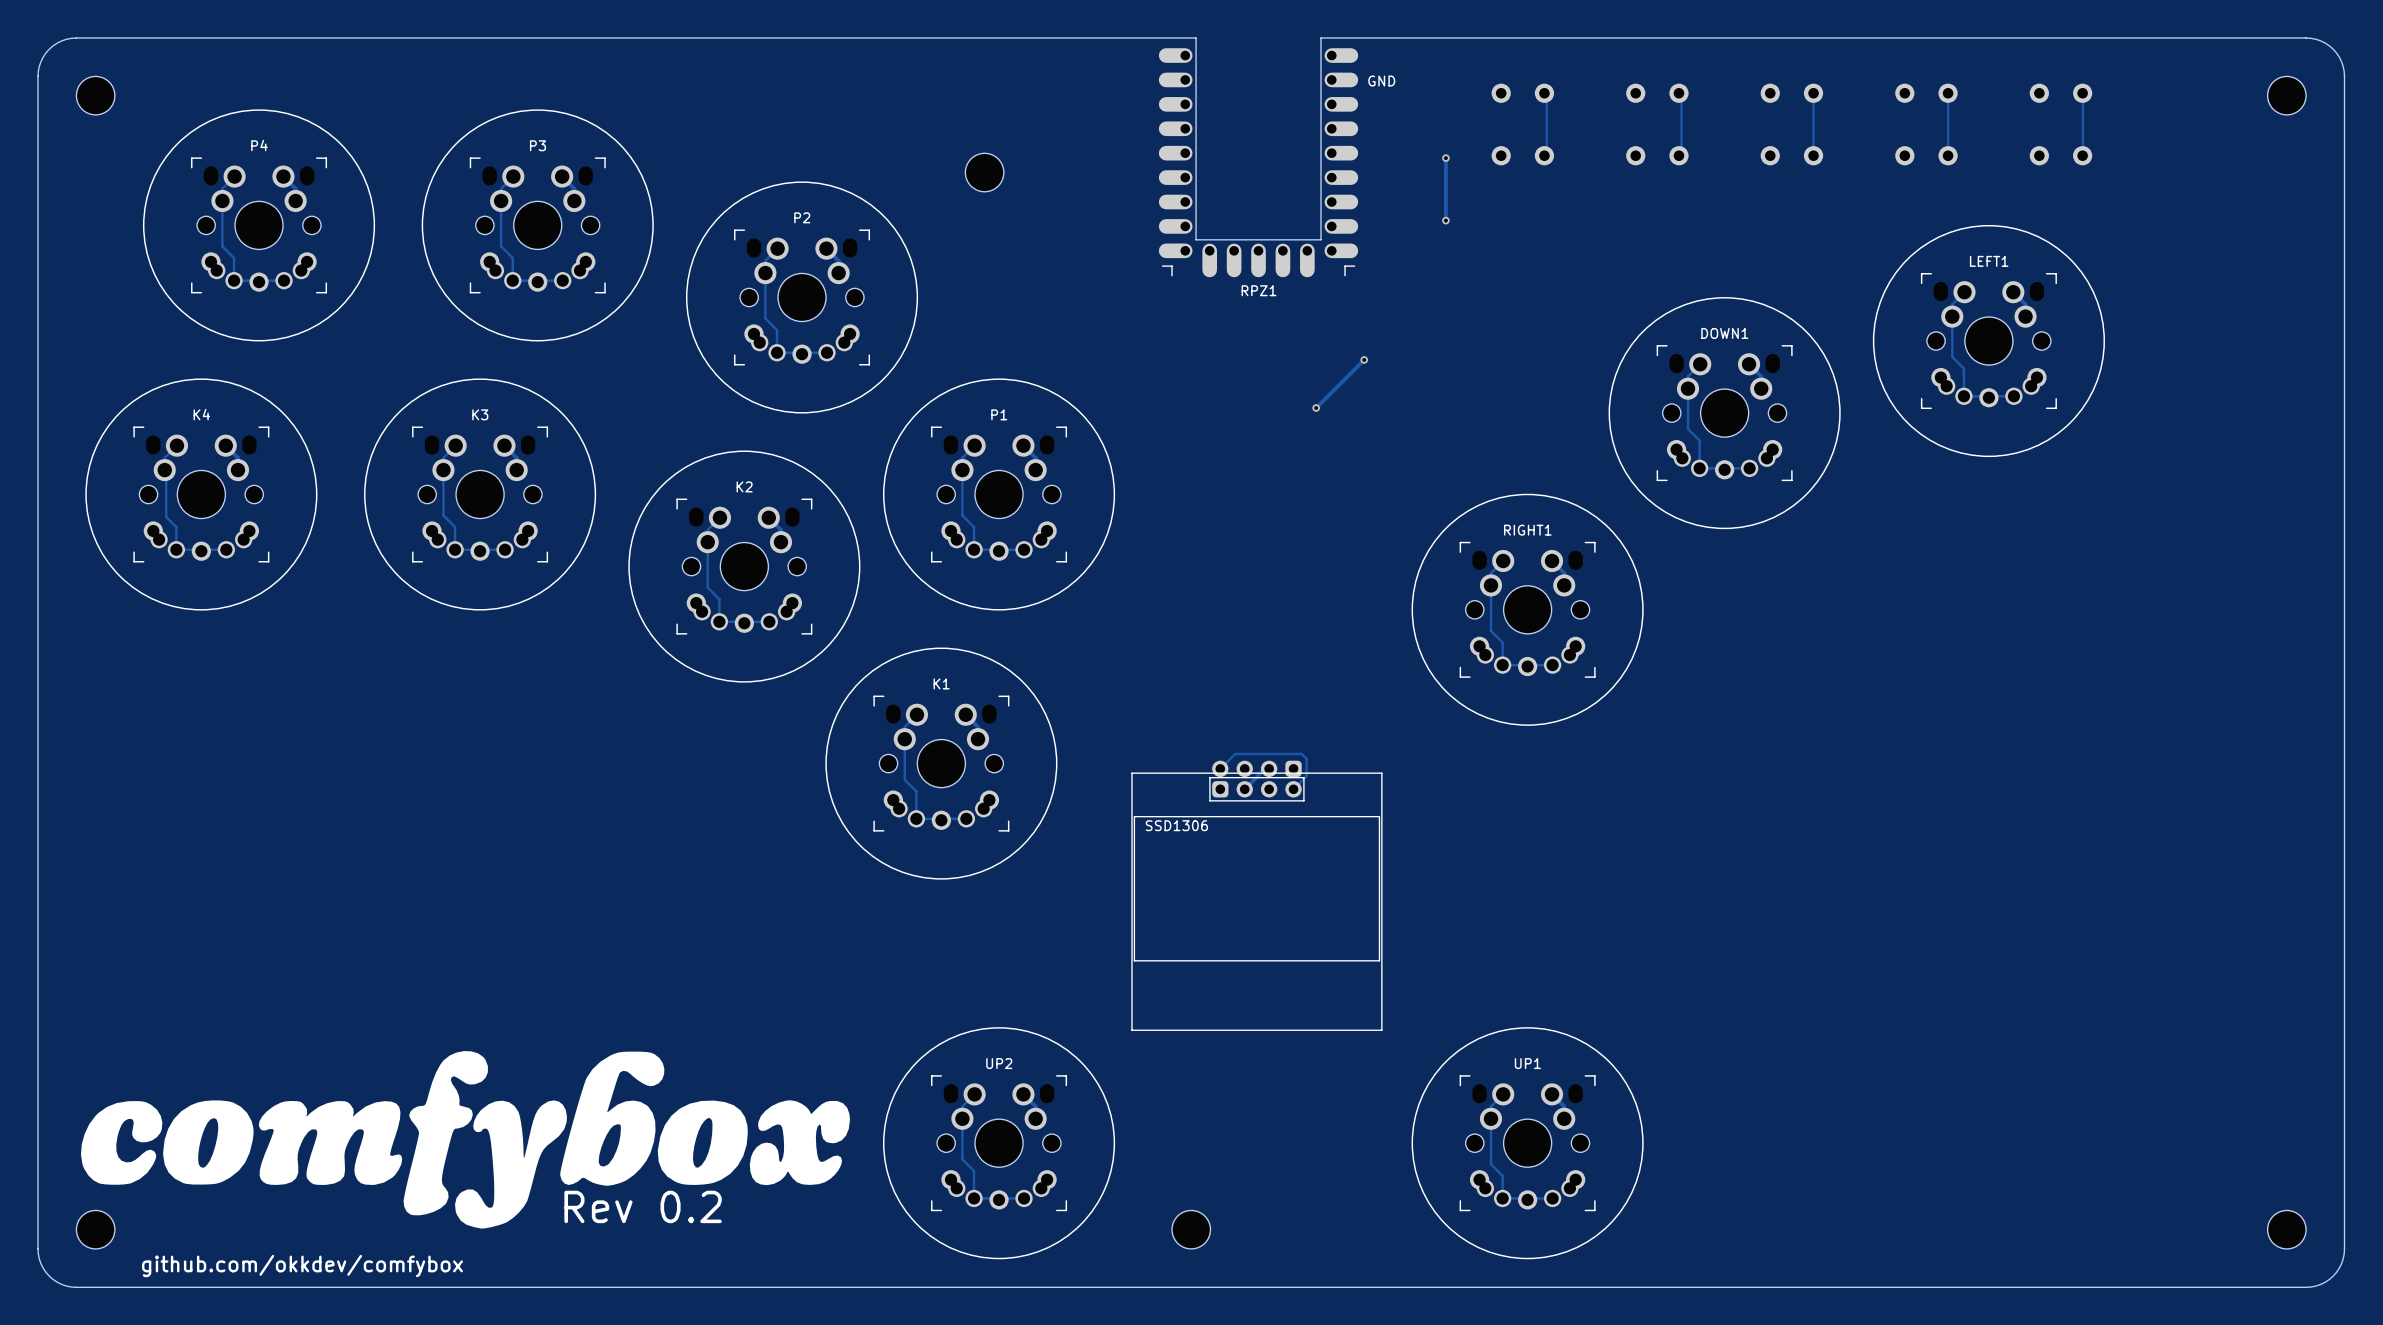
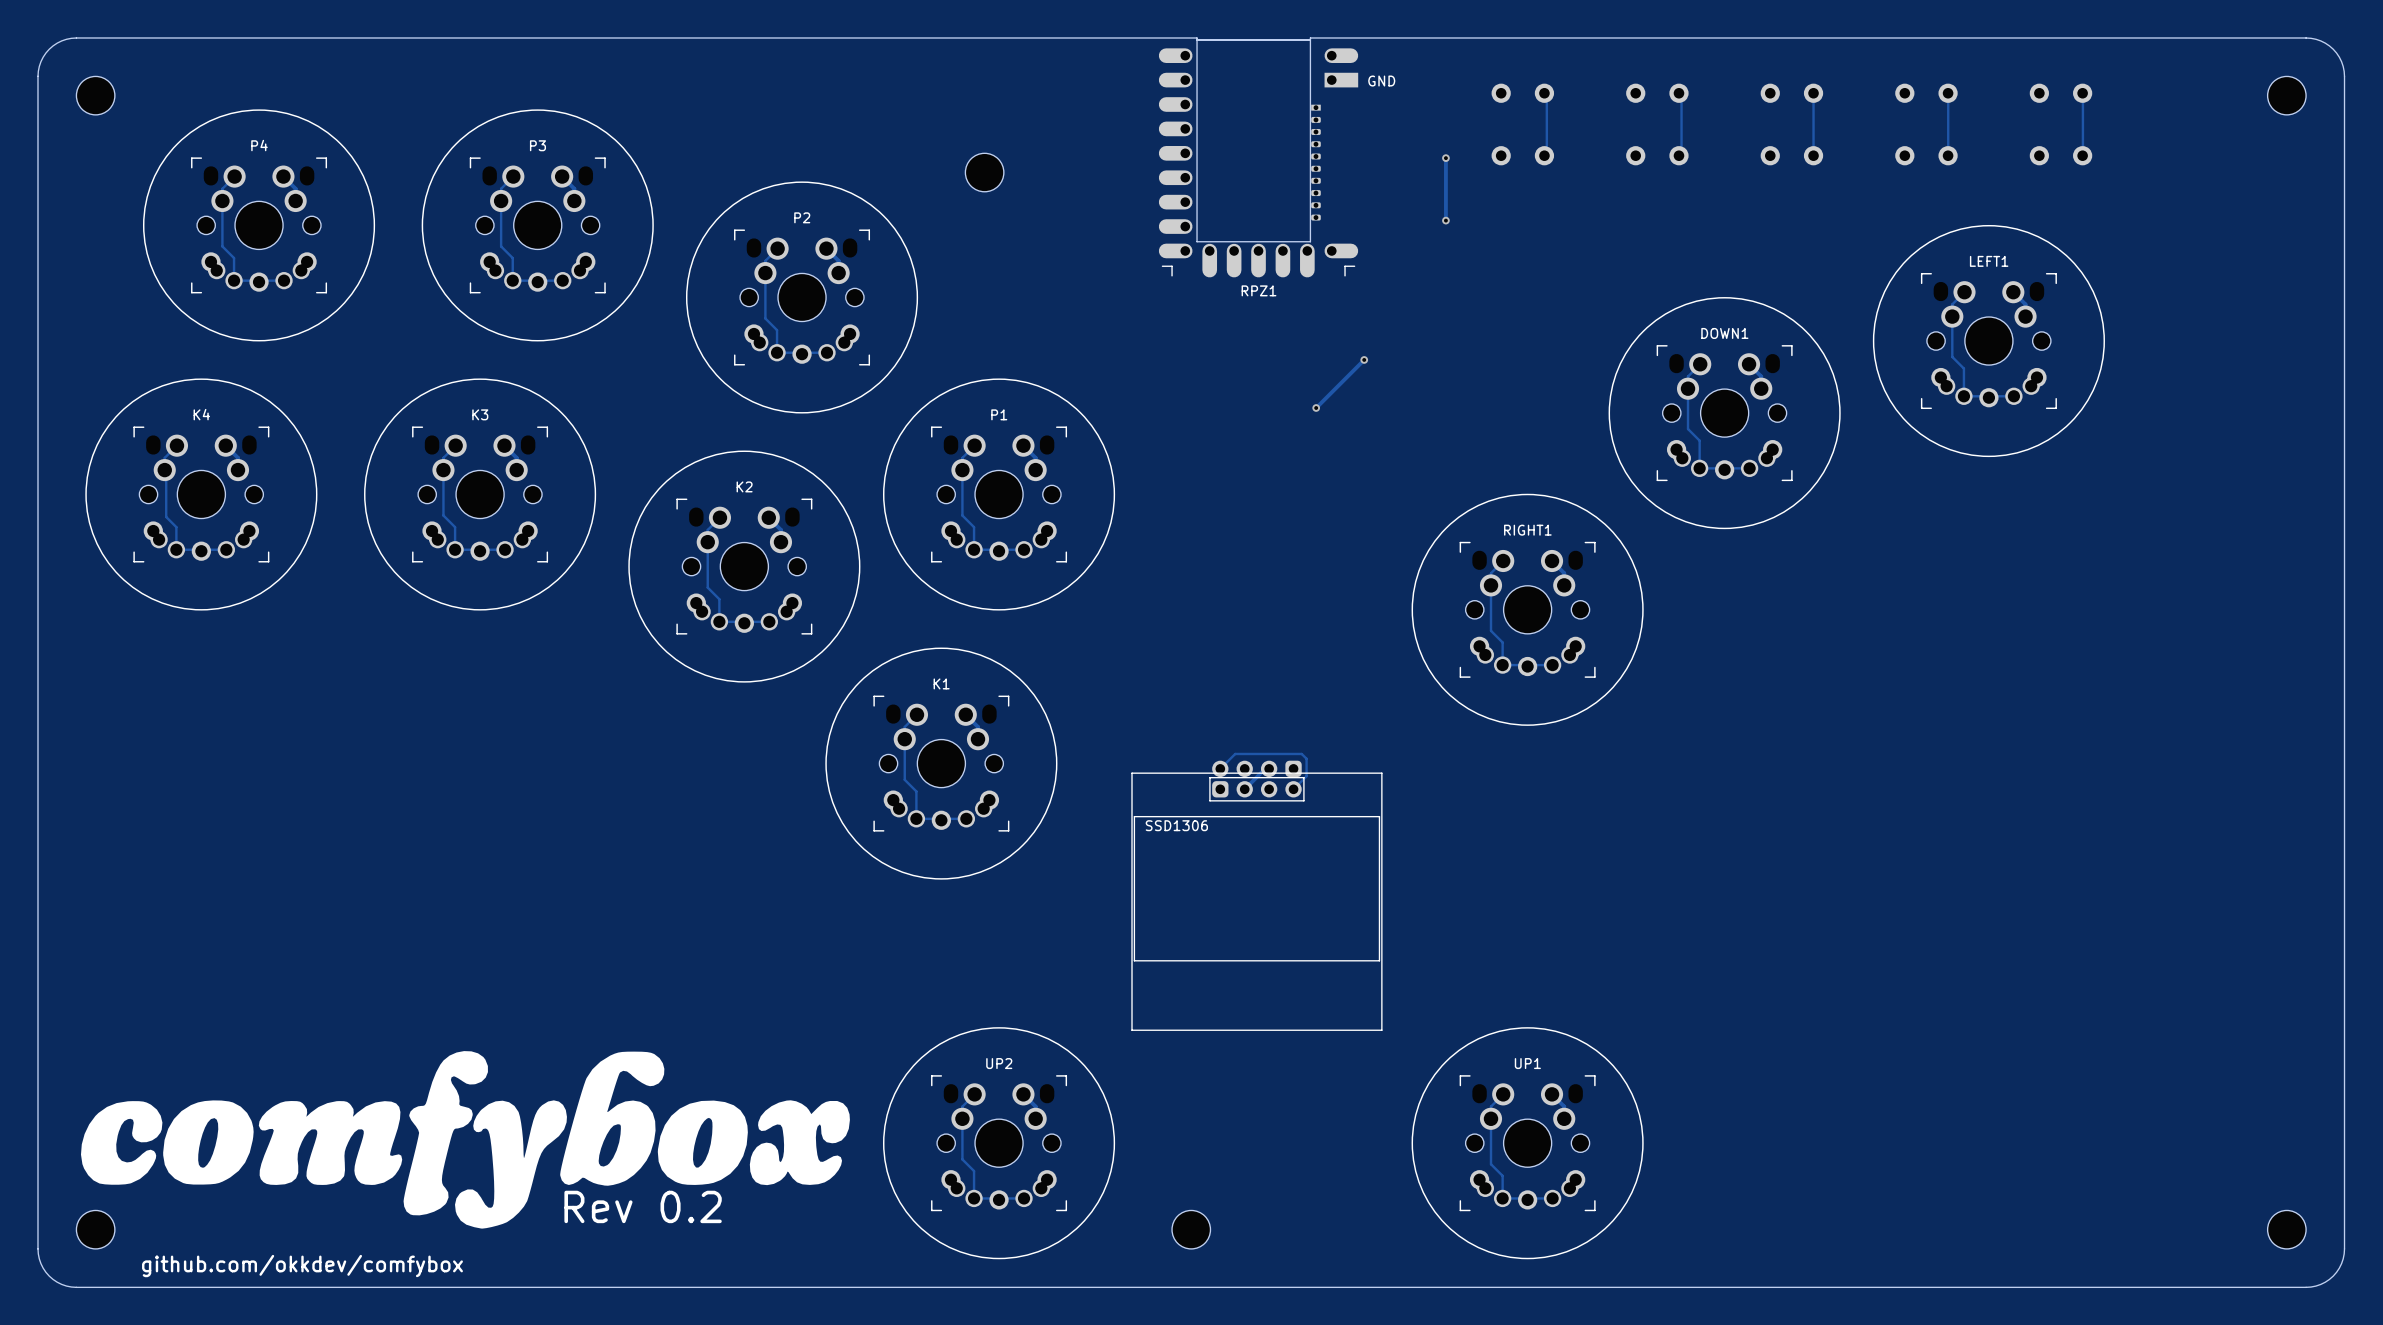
board edge: (1320, 37) (1320, 239) (1196, 239) (1196, 37) -> (1320, 37) (1310, 37) (1310, 39) (1197, 39) (1196, 37)
RPZ1 footprint: [1158, 48, 1359, 278] -> [1158, 39, 1359, 278]

